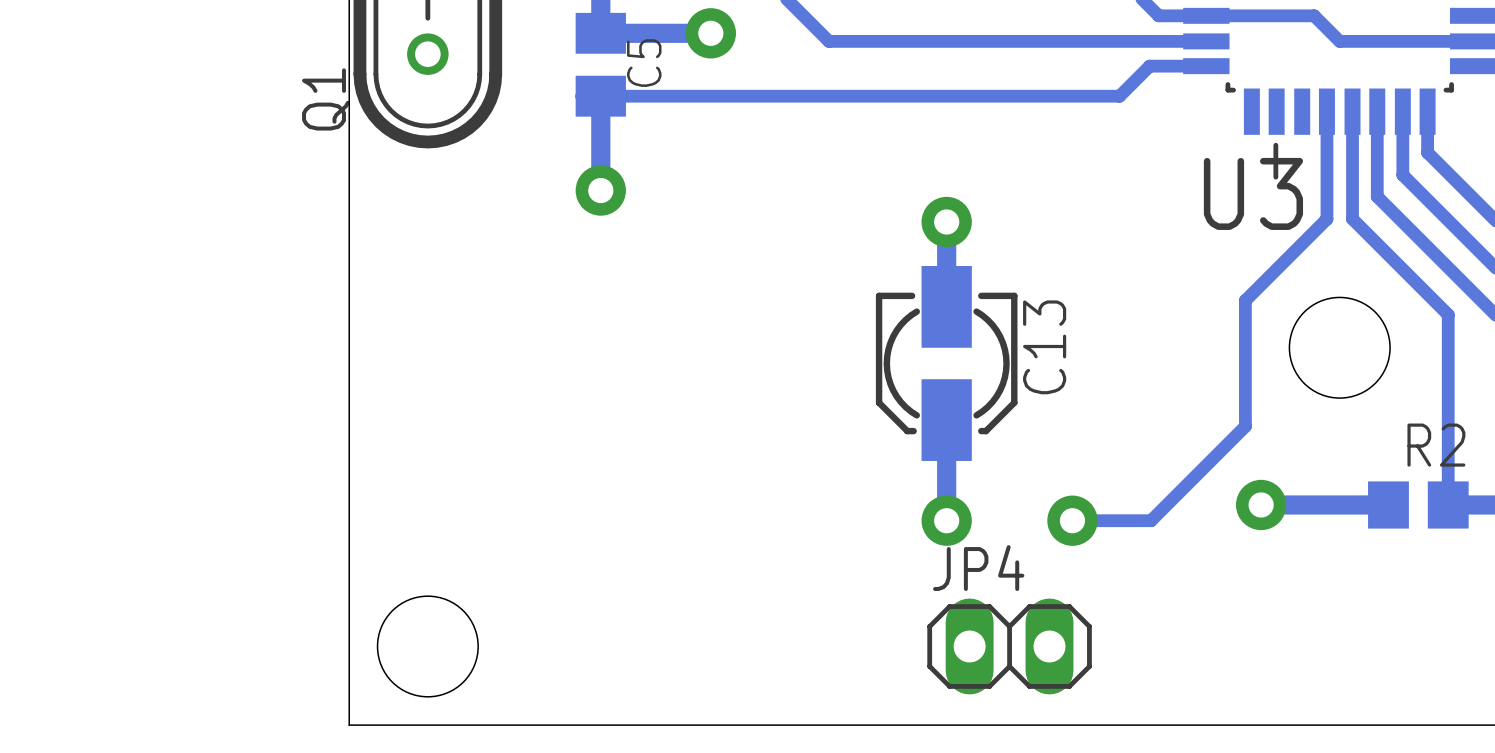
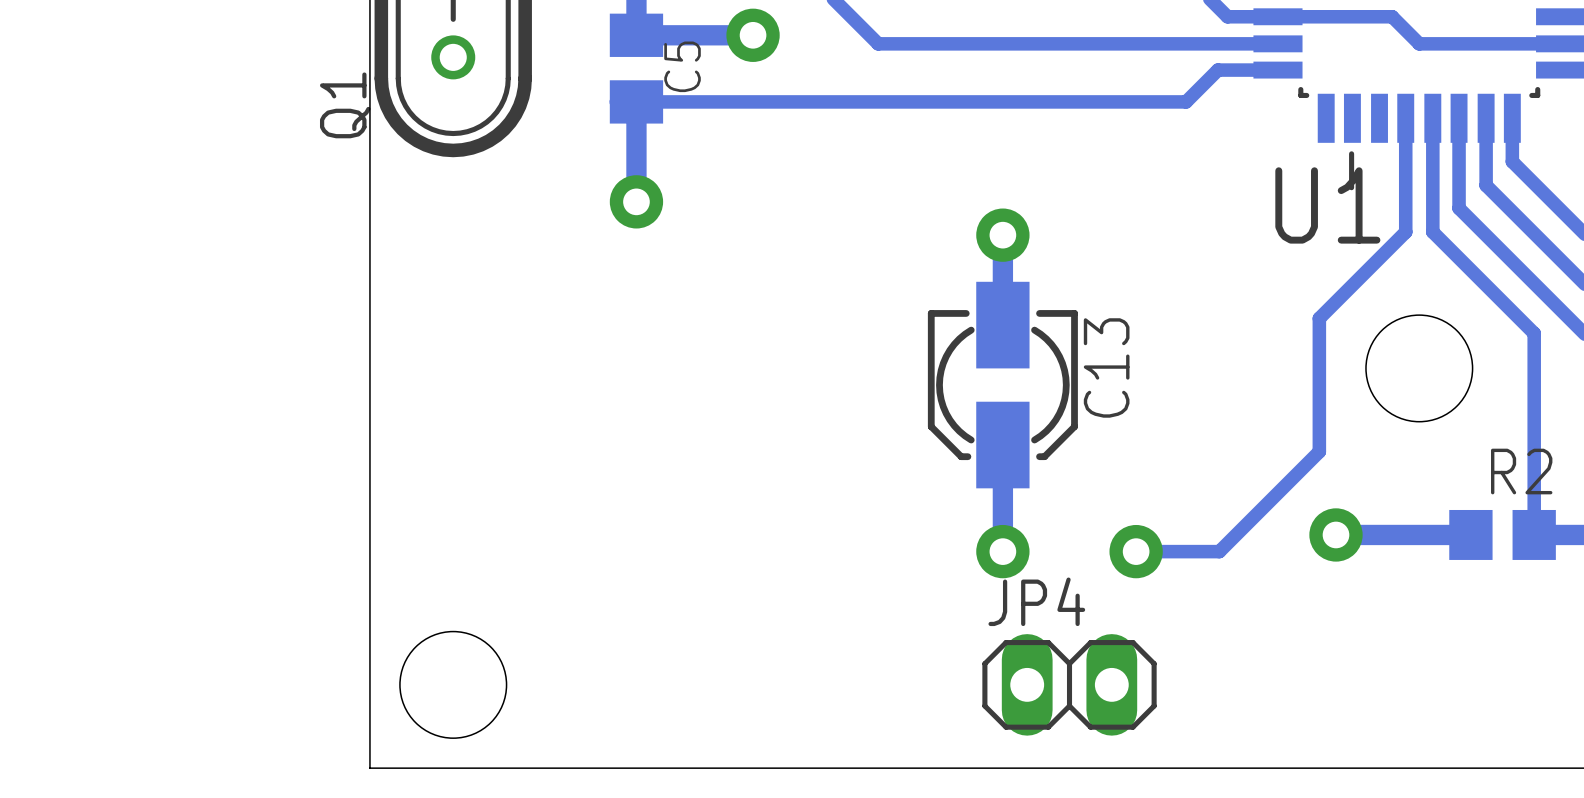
U3 name: U3 (1253, 193) -> U1 (1327, 205)

